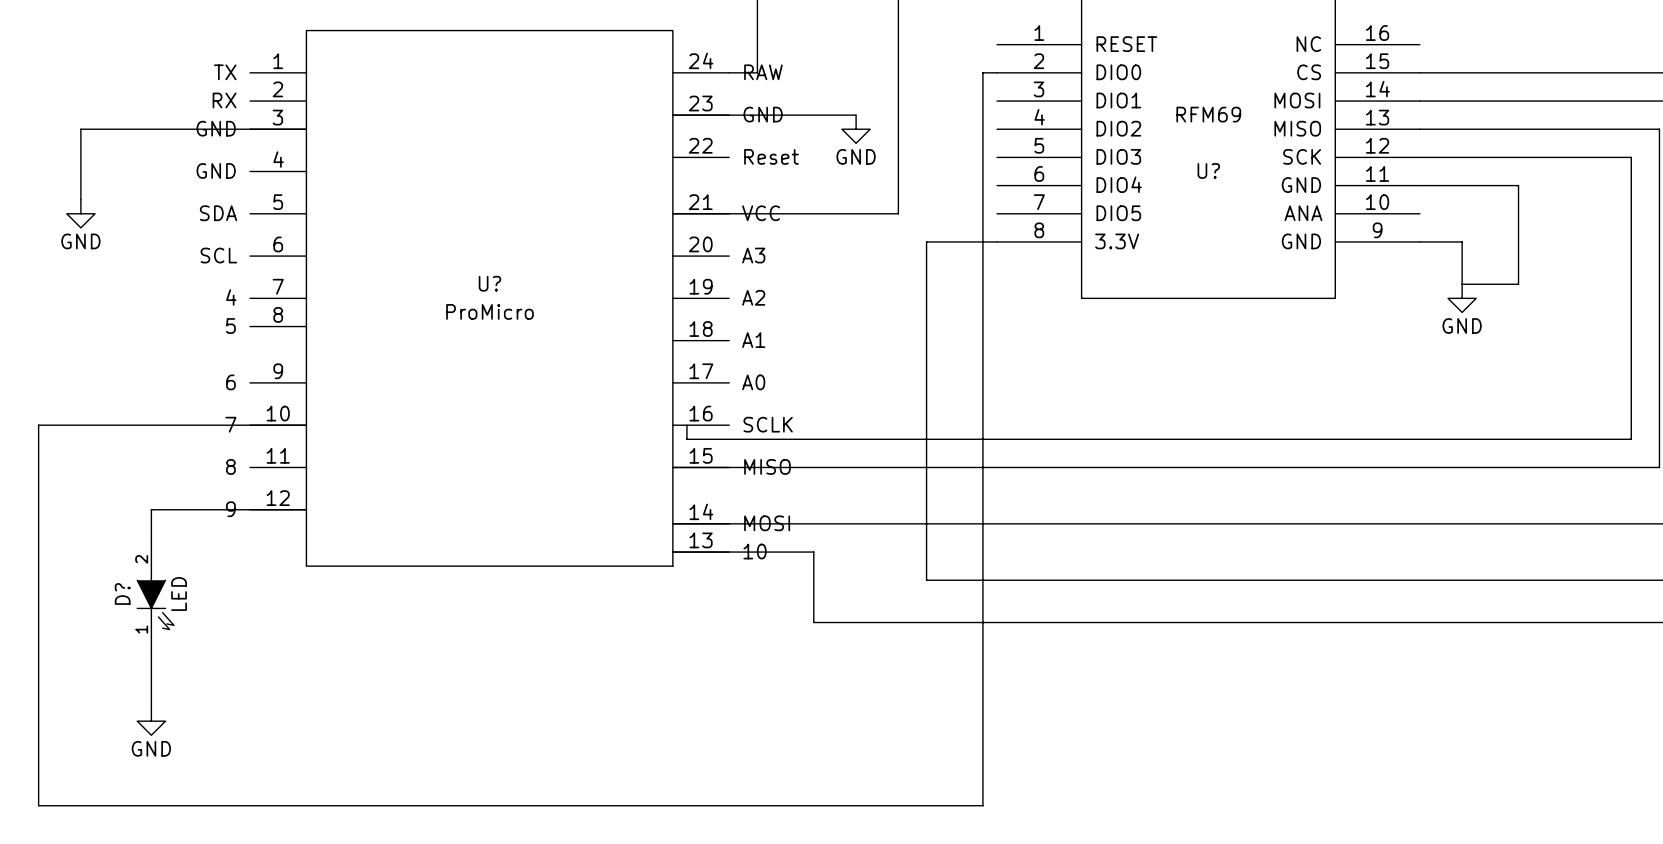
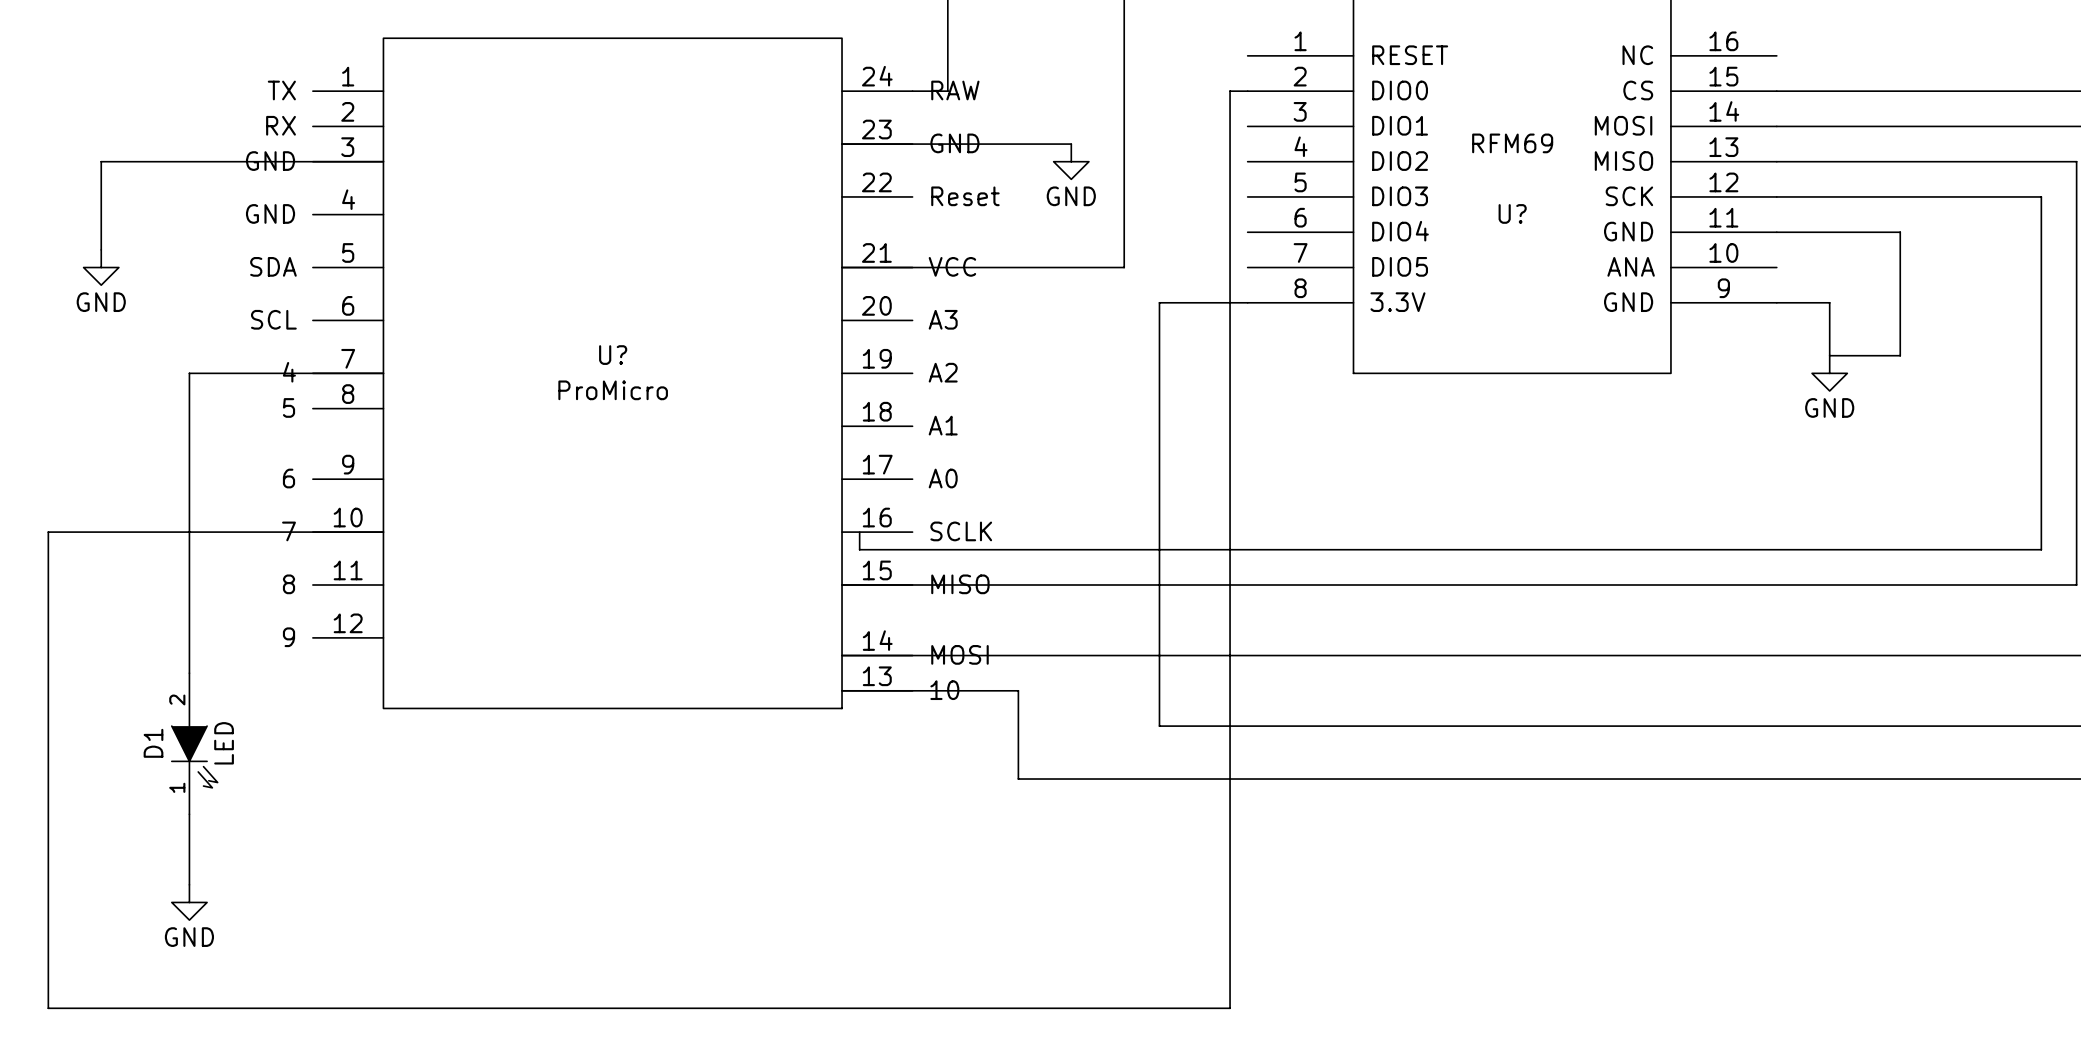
wire: (151, 509) (306, 509) -> (189, 637) (189, 373) (383, 373)
D? name: D? (122, 593) -> D1 (153, 743)

